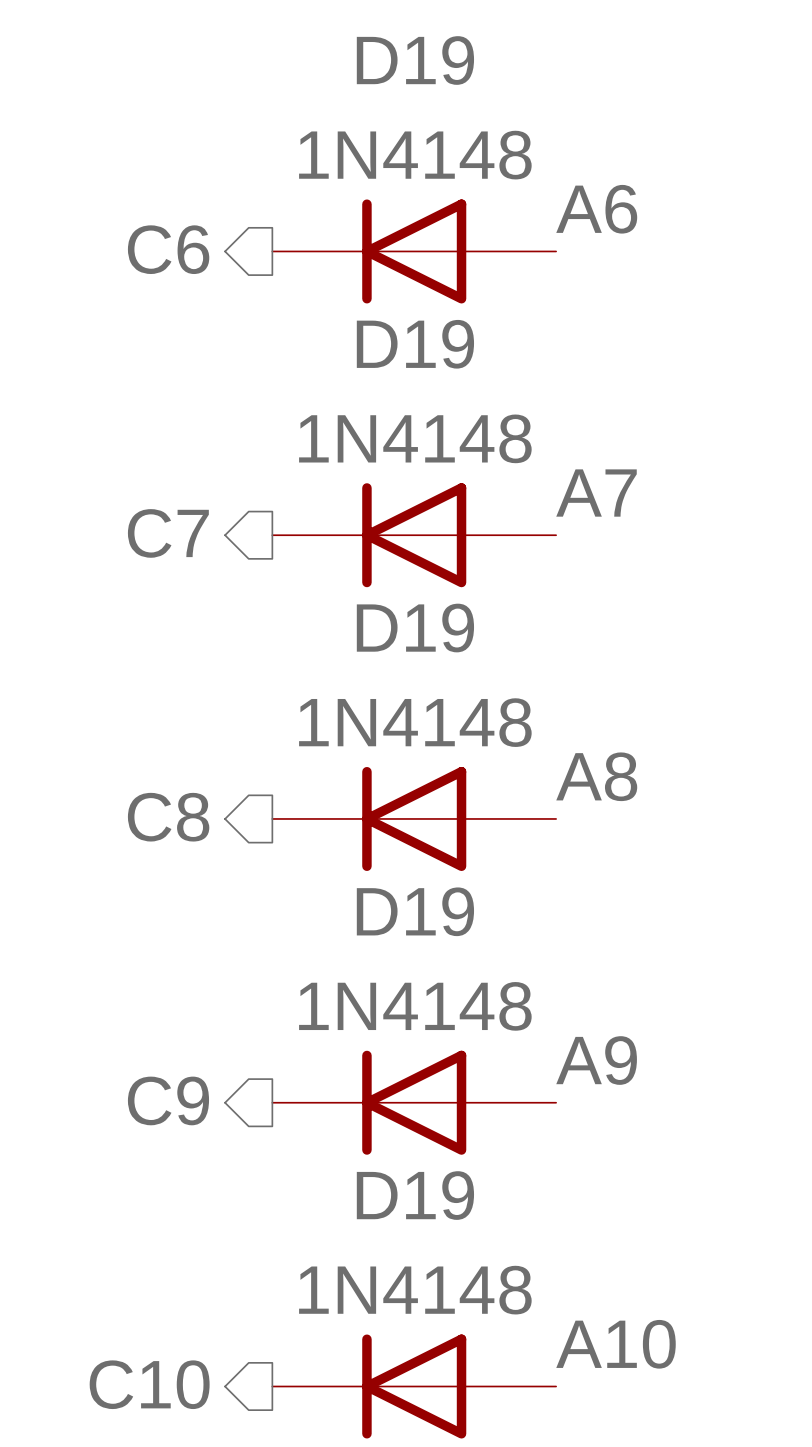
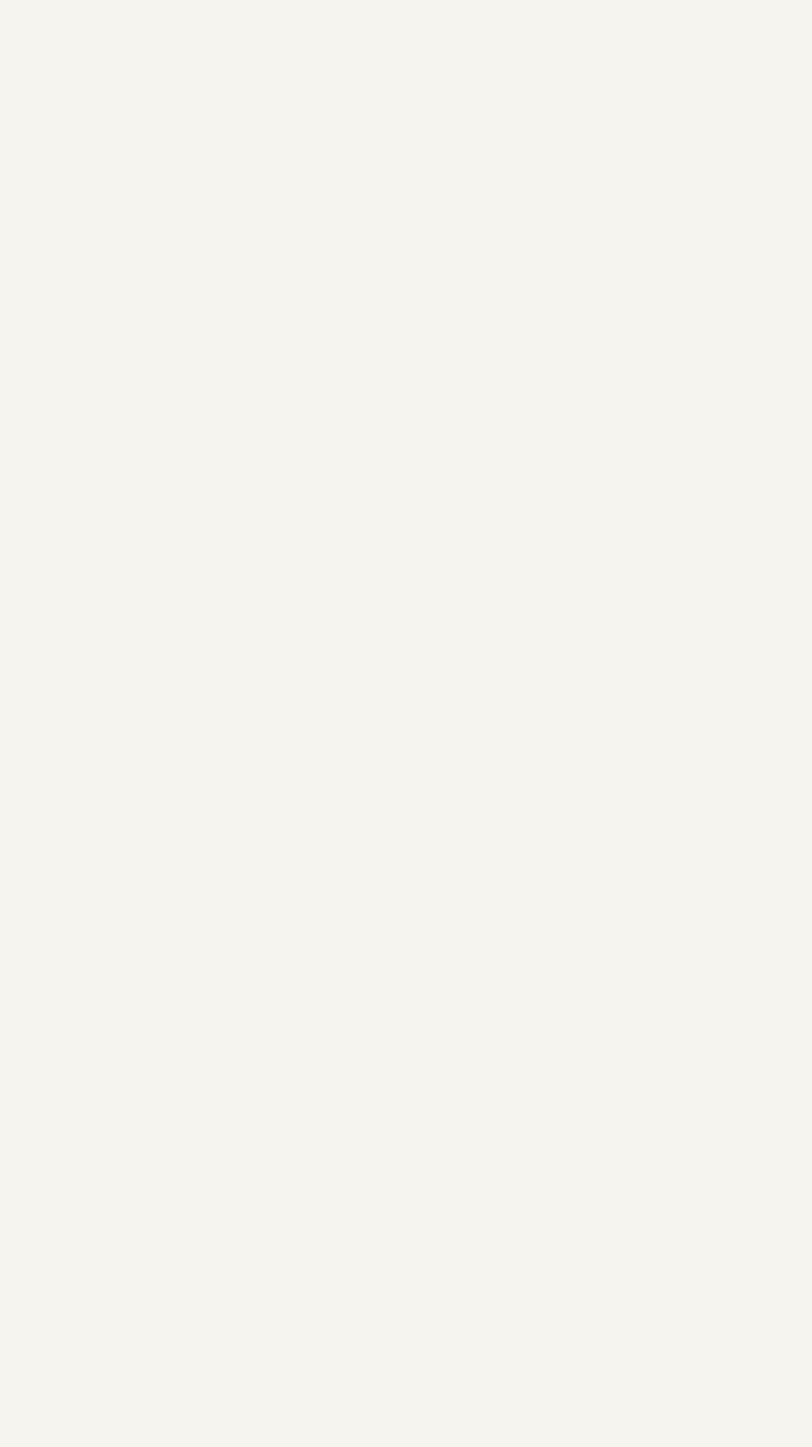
label: A6 (596, 209) -> none
hierarchical label: C6 (168, 249) -> none
D19: 1N4148 (414, 251) -> none
label: A7 (596, 493) -> none
hierarchical label: C7 (168, 533) -> none
D19: 1N4148 (414, 535) -> none
label: A8 (596, 776) -> none
hierarchical label: C8 (168, 817) -> none
D19: 1N4148 (414, 818) -> none
label: A9 (596, 1060) -> none
hierarchical label: C9 (168, 1100) -> none
D19: 1N4148 (414, 1102) -> none
label: A10 (616, 1344) -> none
hierarchical label: C10 (149, 1384) -> none
D19: 1N4148 (414, 1386) -> none

